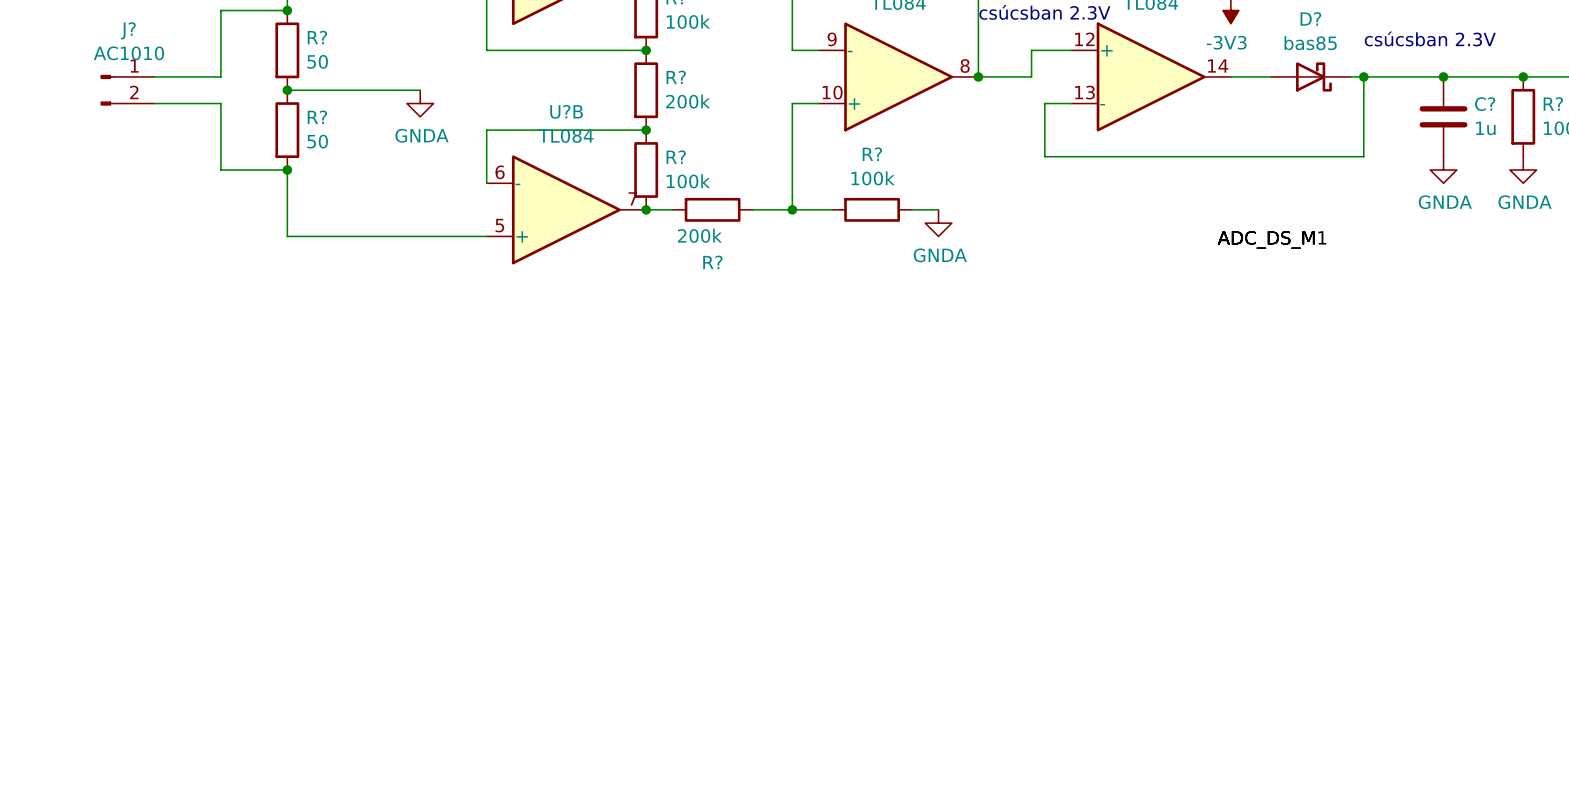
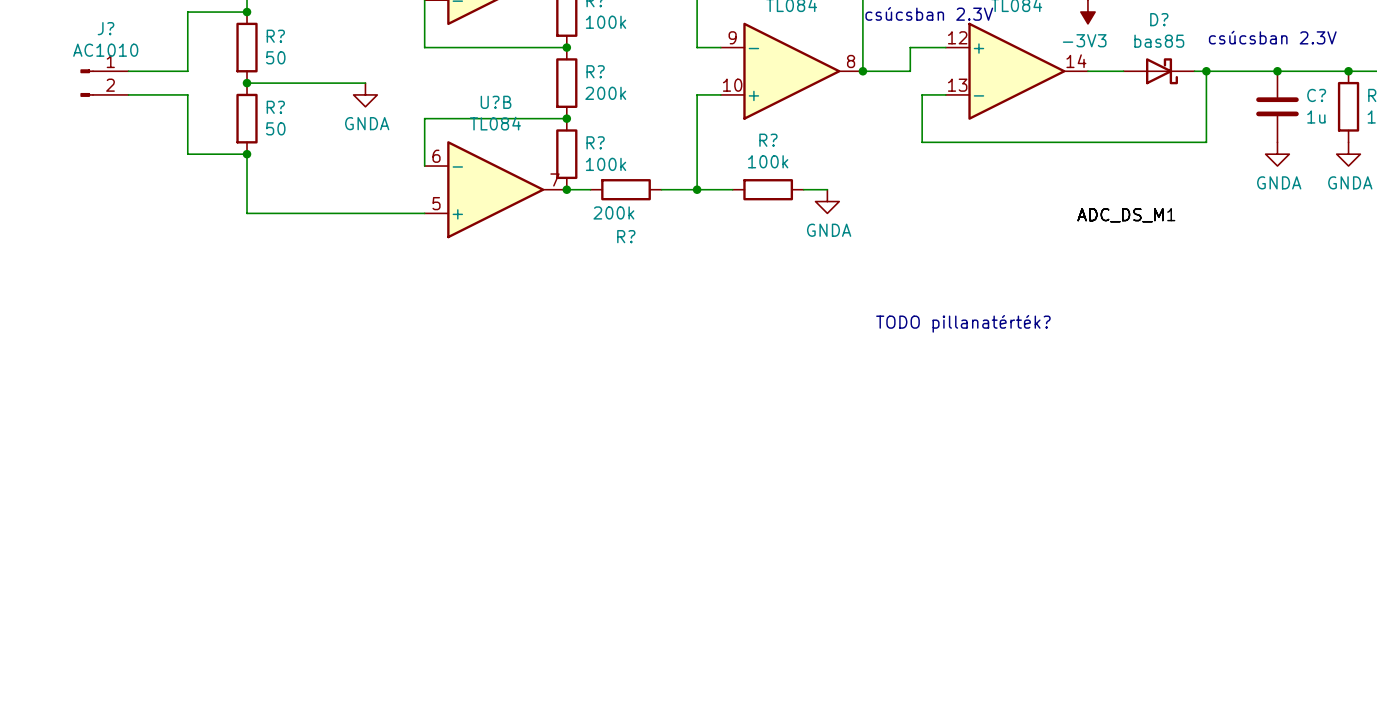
text: none -> TODO pillanatérték? (963, 323)

